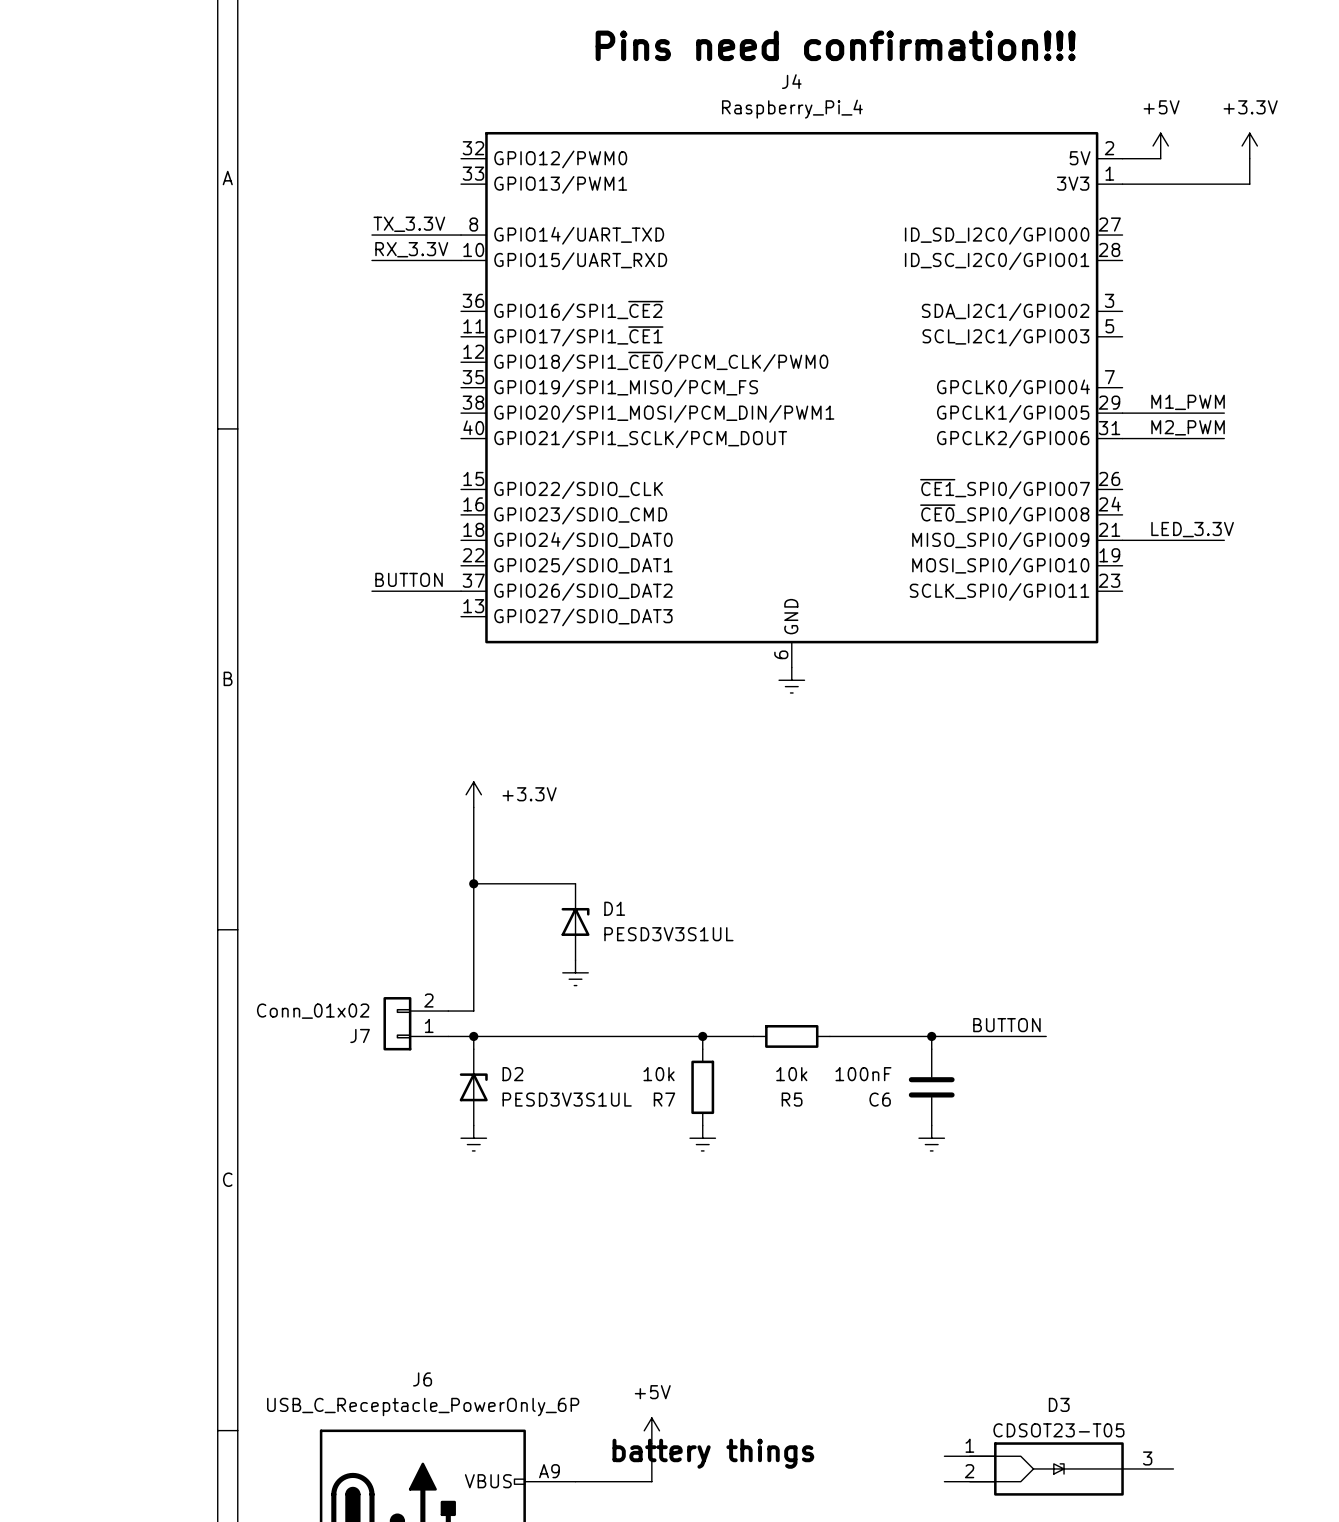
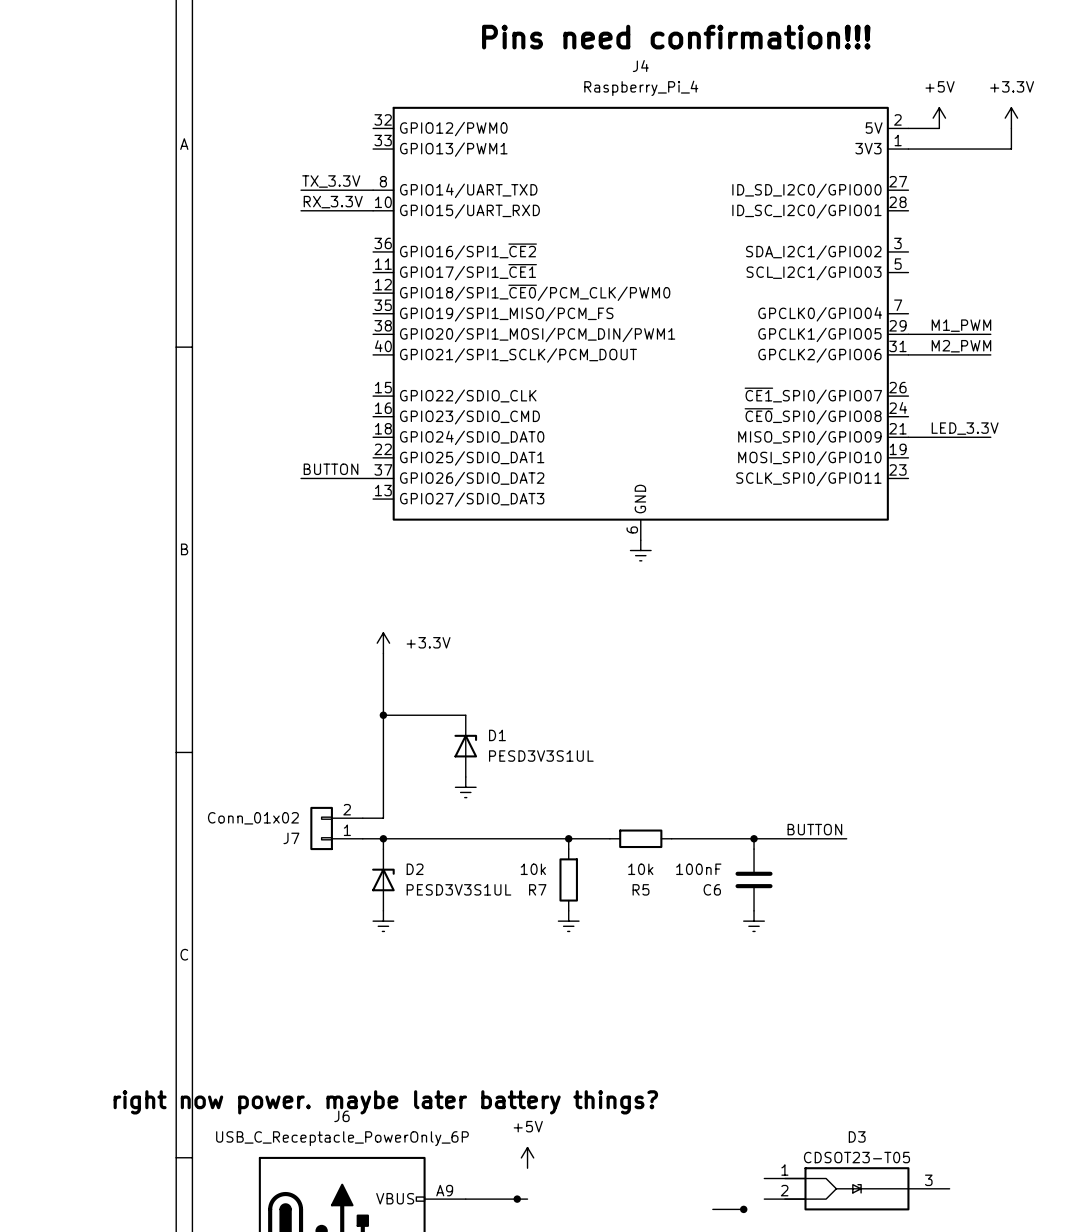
text: none -> right now power. maybe later battery things? (385, 1102)
wire: (651, 1443) (651, 1481) -> none
text: battery things (713, 1453) -> none
junction: none -> (517, 1199)
wire: none -> (712, 1209) (743, 1209)
junction: none -> (743, 1209)

